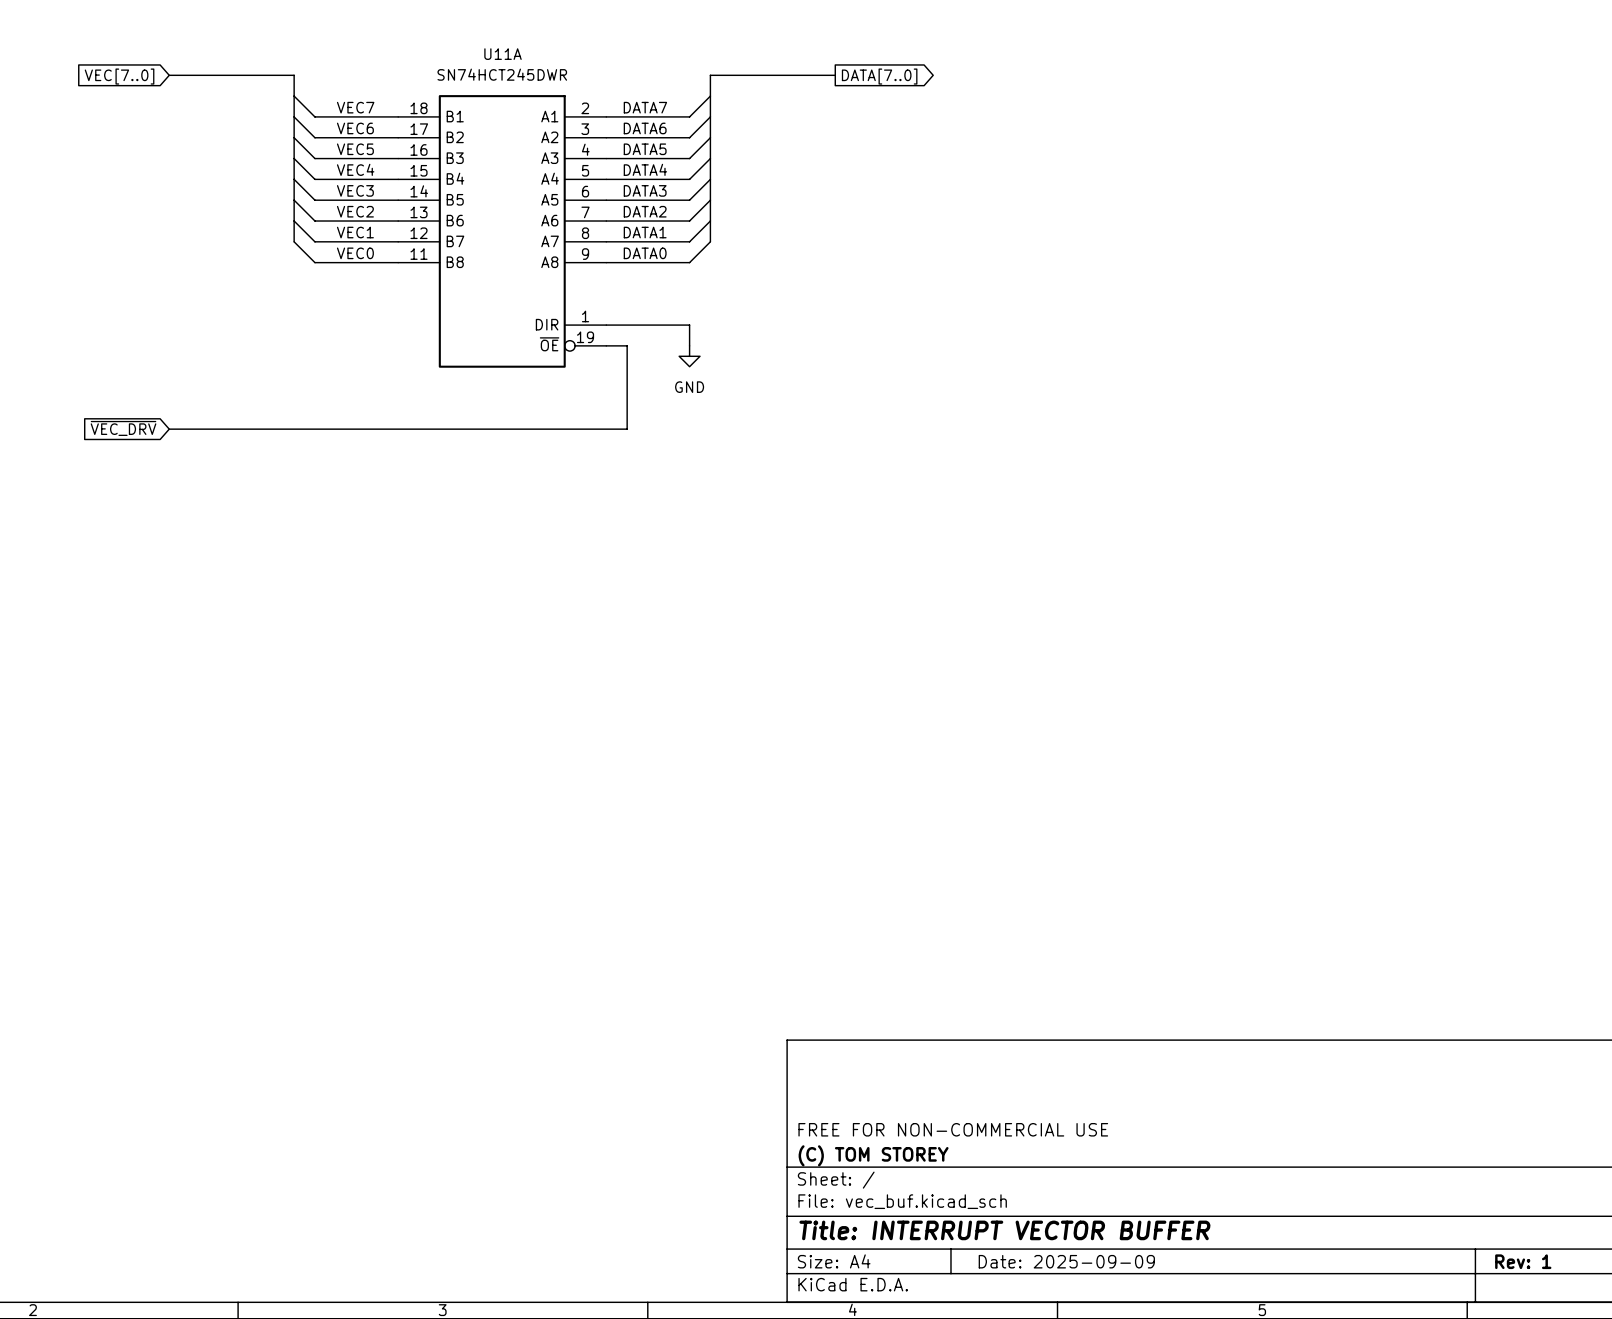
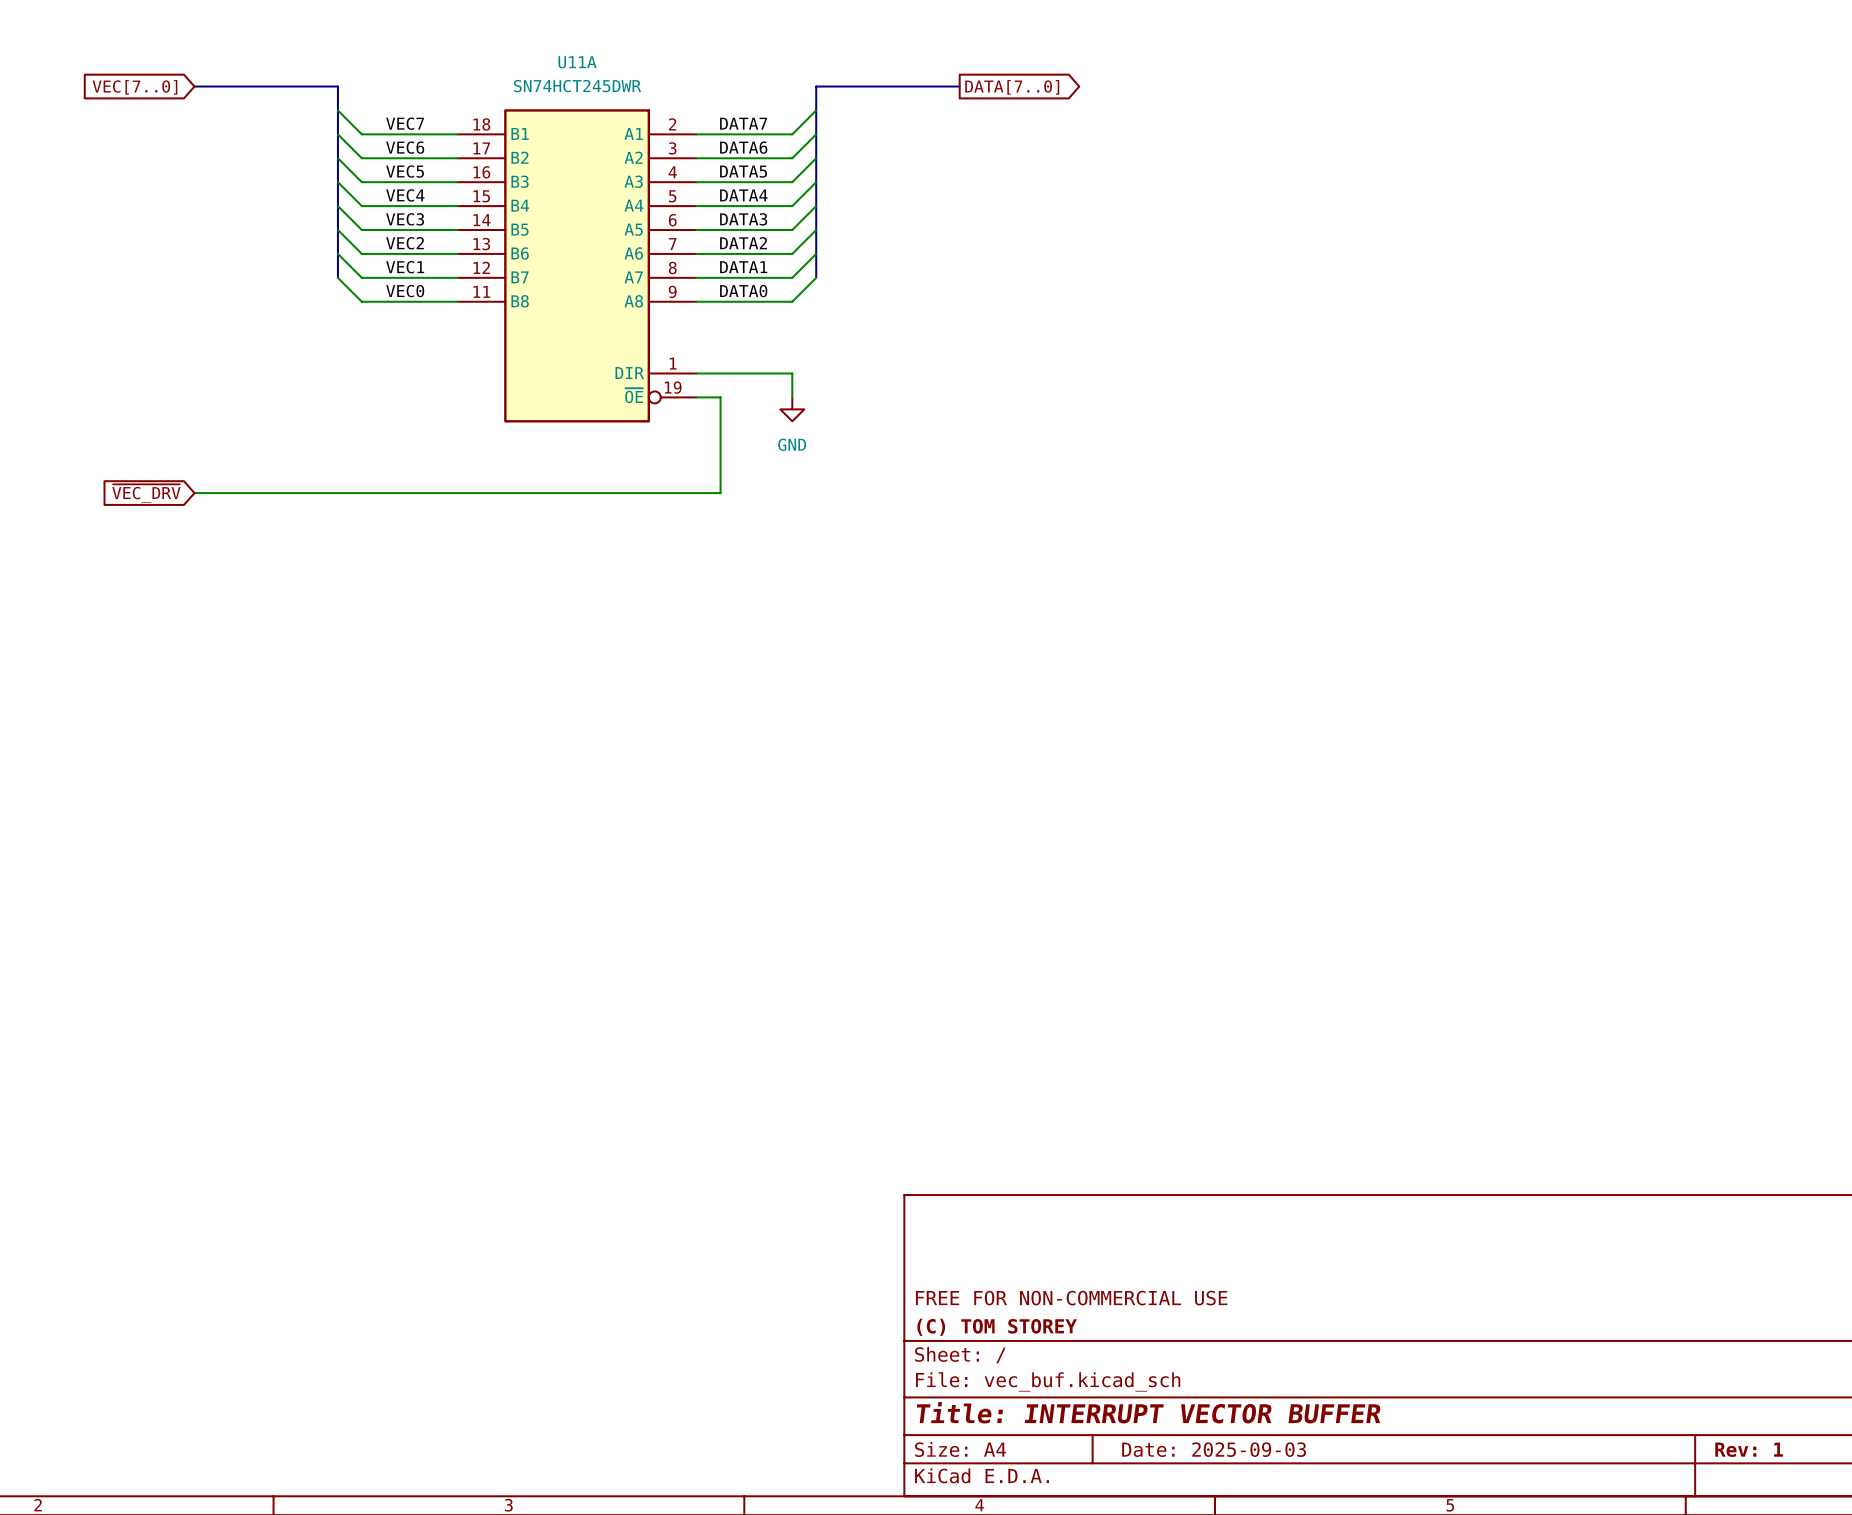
title block: Date: 2025-09-09 (1066, 1261) -> Date: 2025-09-03 (1214, 1449)

